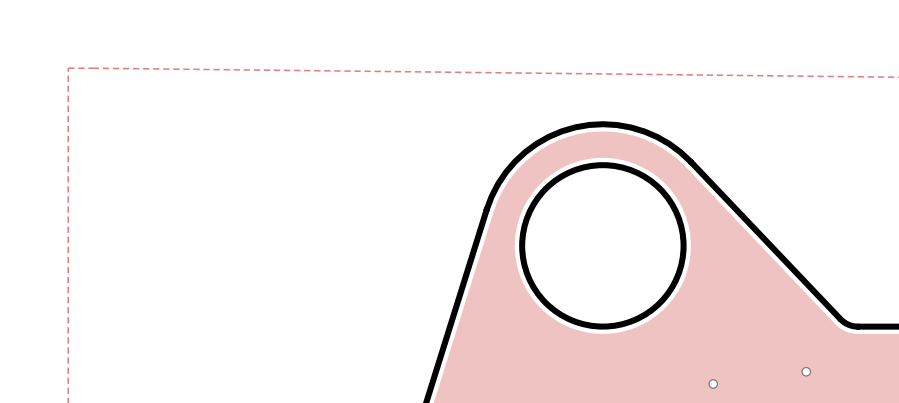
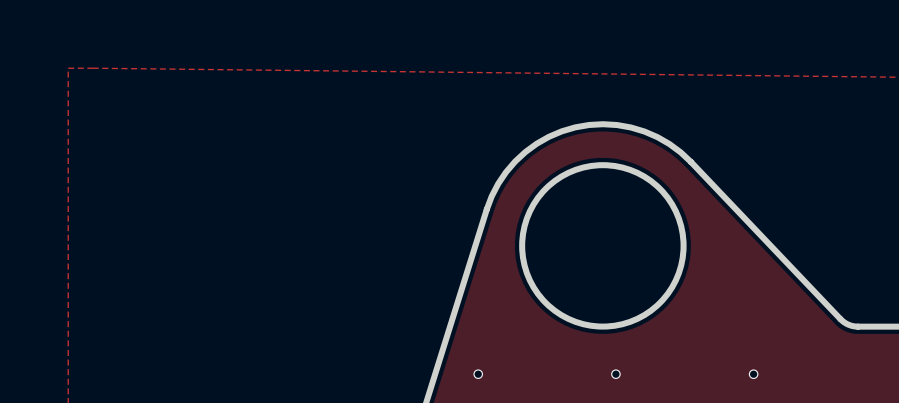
via: (806, 371) -> none
via: none -> (478, 374)
via: none -> (615, 374)
via: none -> (753, 374)
via: (713, 383) -> none

